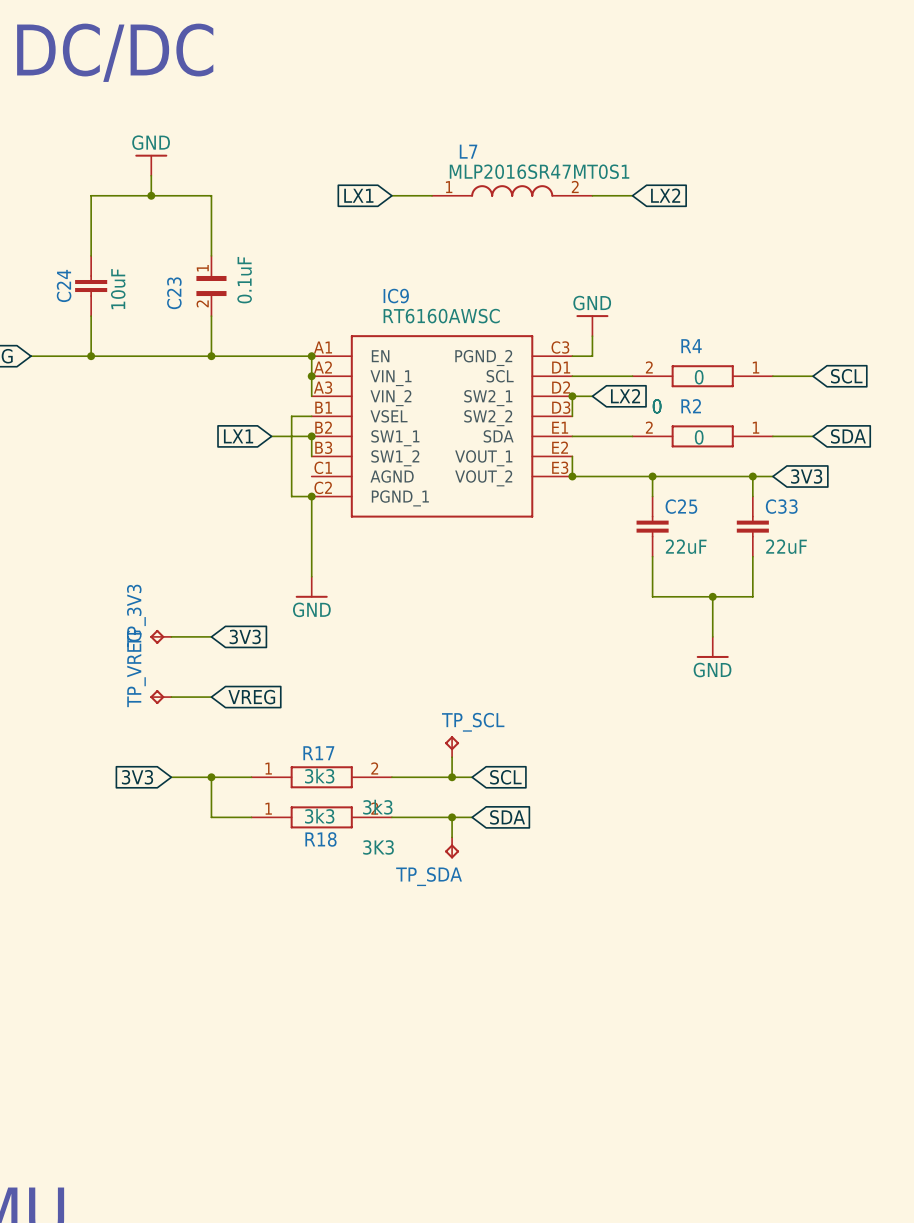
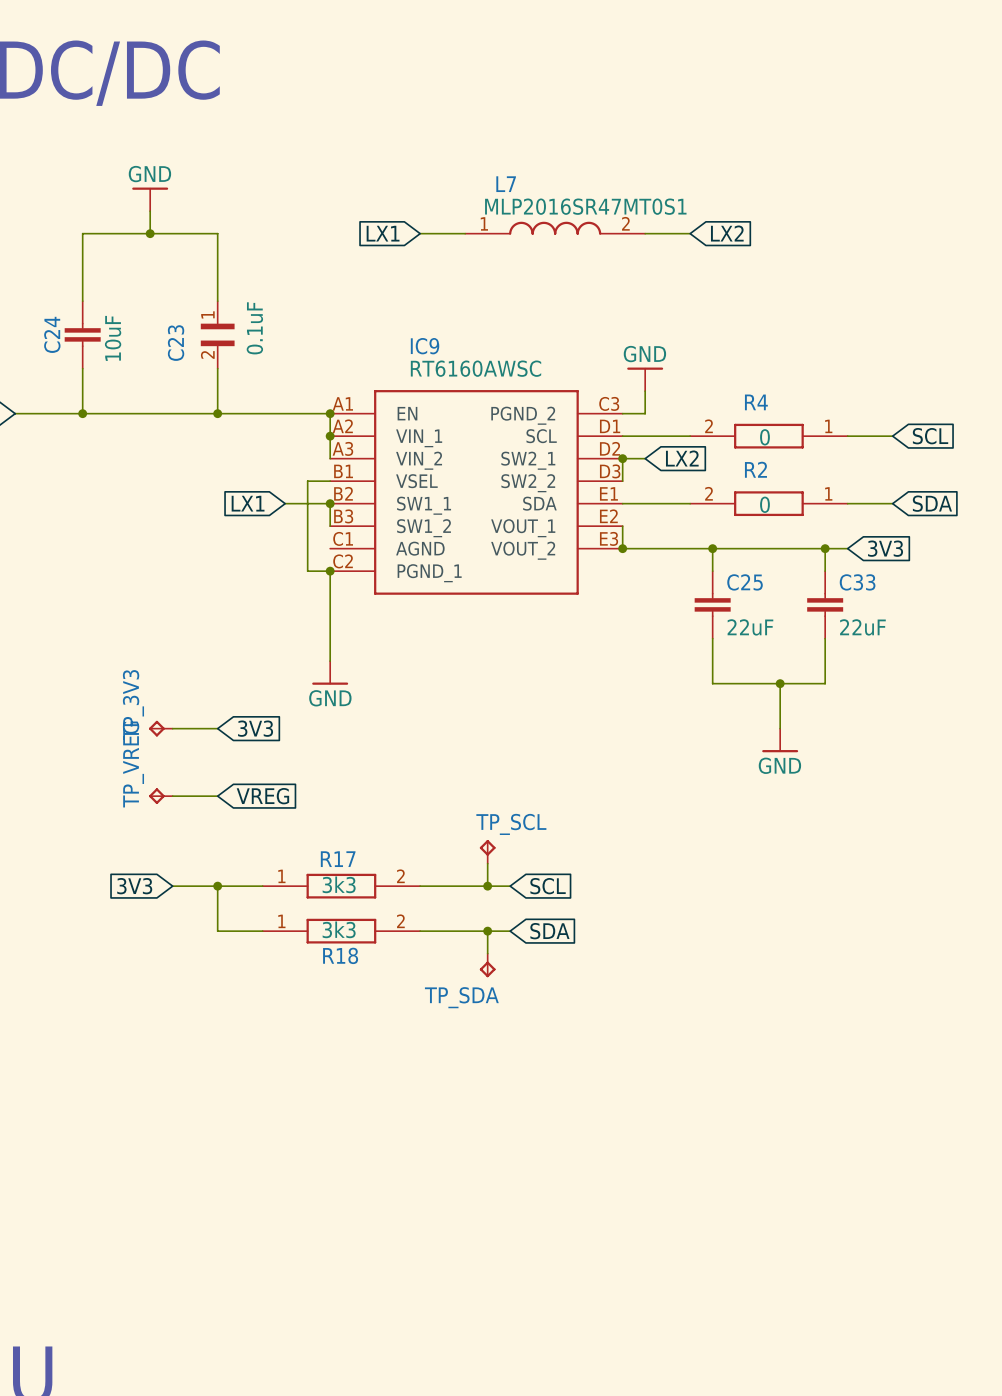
R4 value: 0 (657, 406) -> none
R2 value: 0 (657, 406) -> none
R17 value: 3k3 (377, 807) -> none
R18 value: 3K3 (378, 847) -> none

